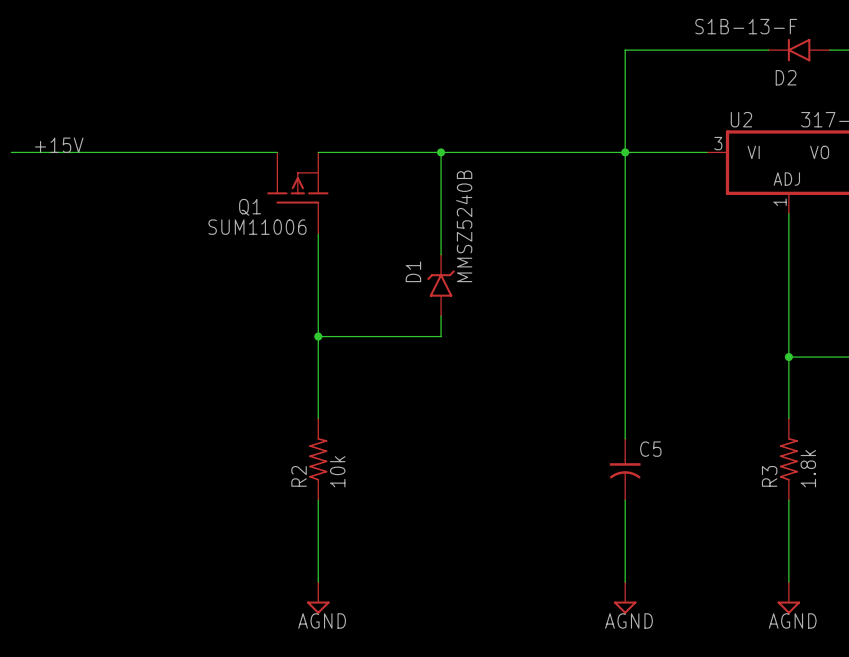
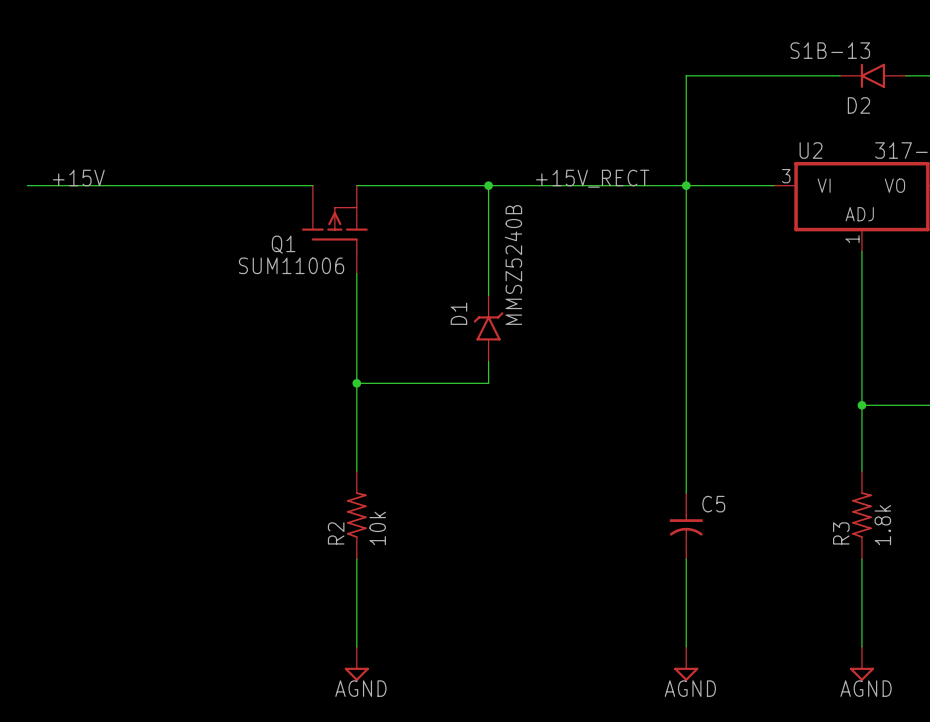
D2 value: S1B-13-F (746, 26) -> S1B-13 (830, 50)
label: none -> +15V_RECT (592, 178)

